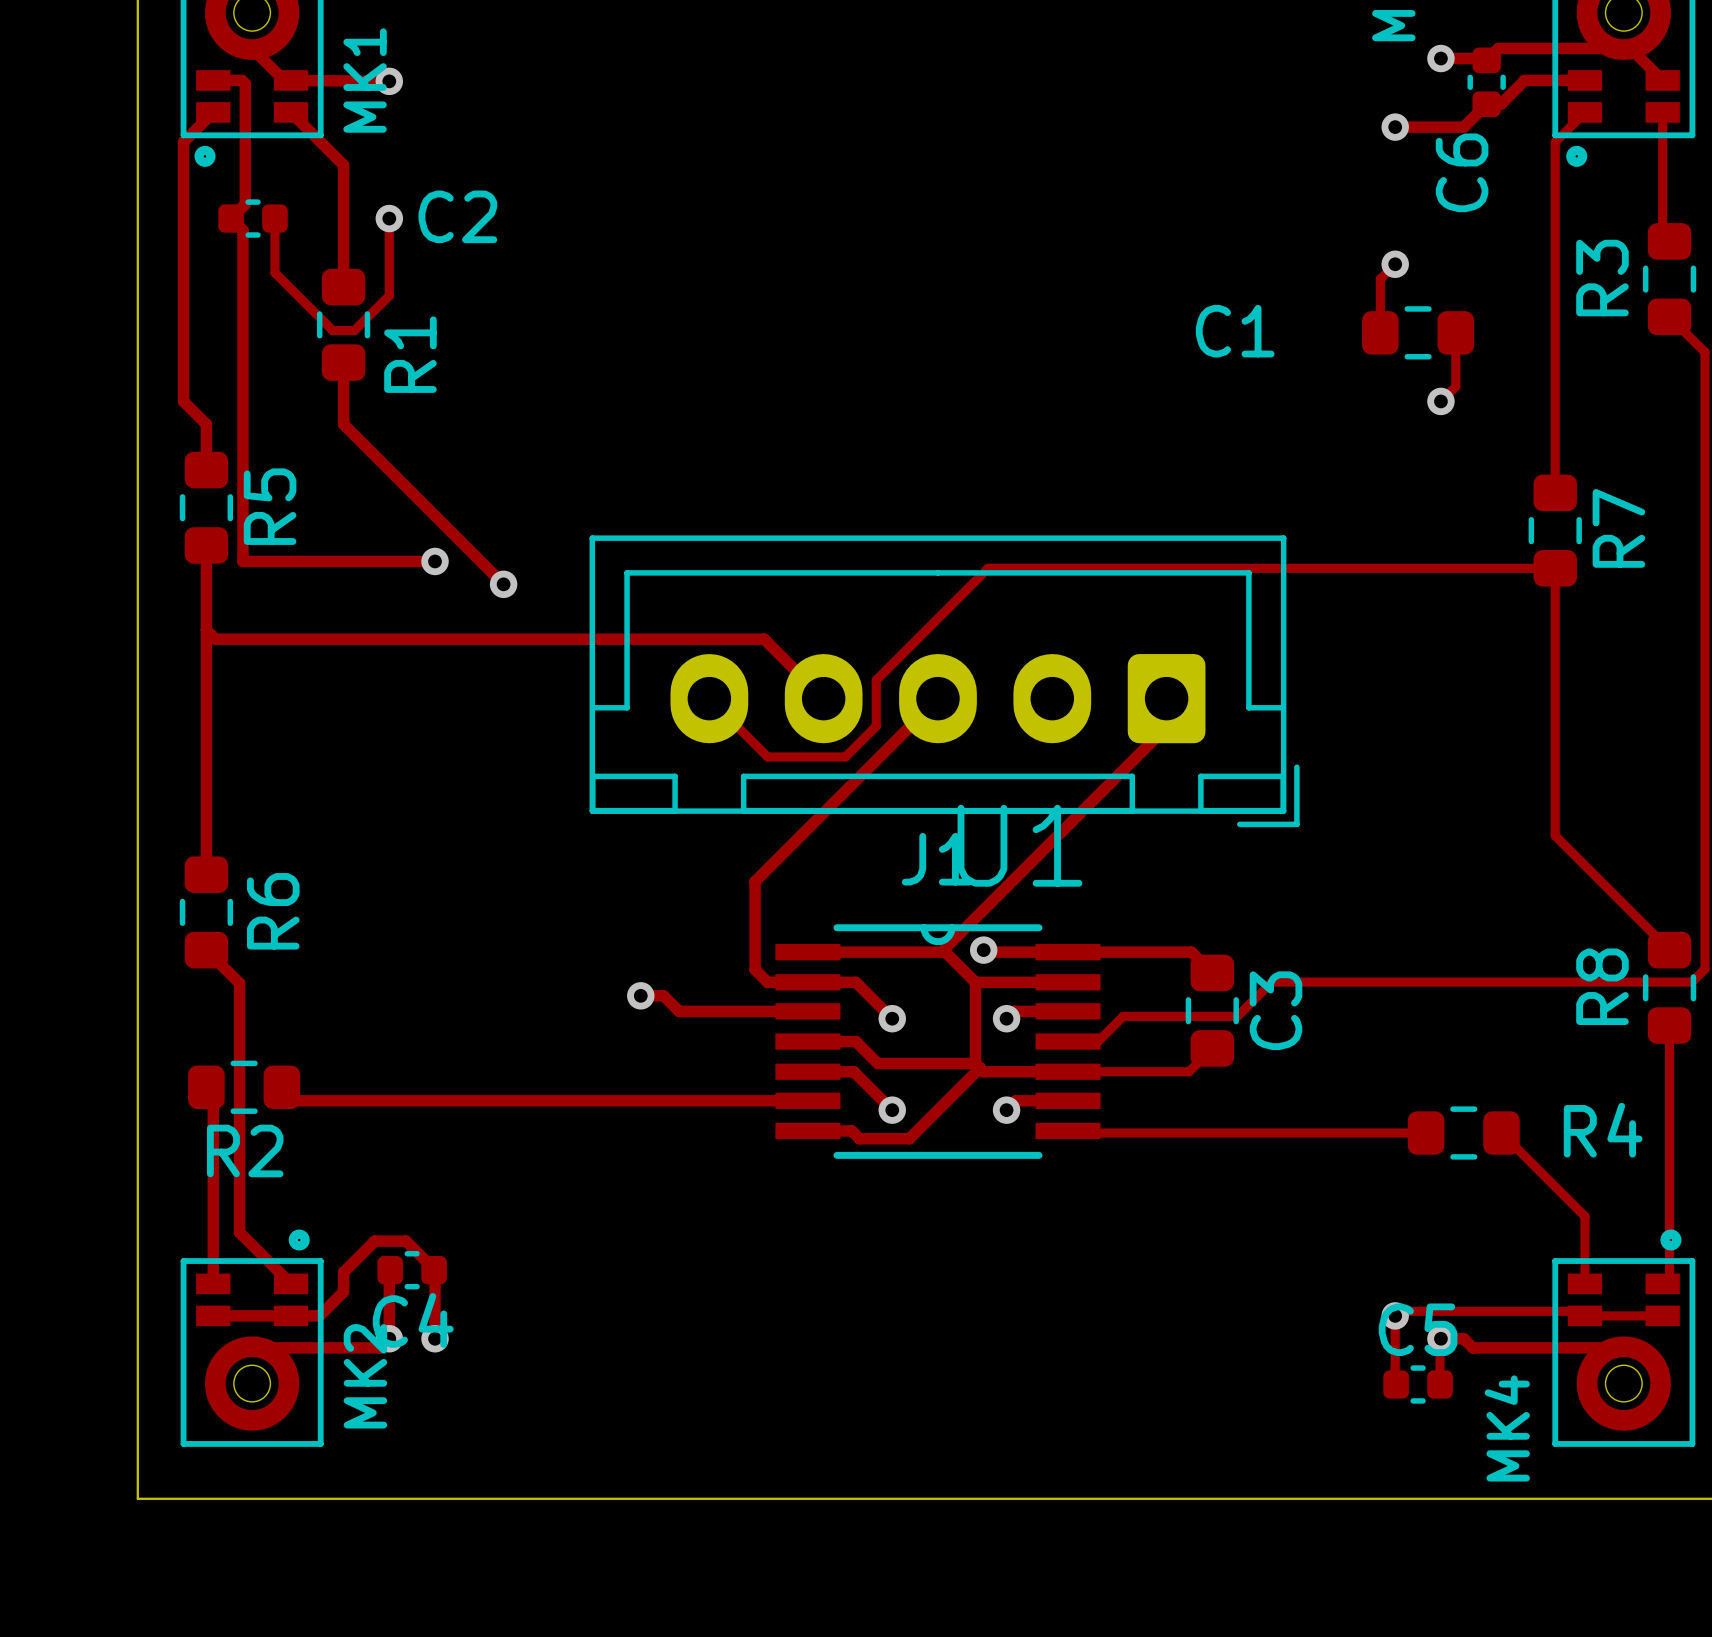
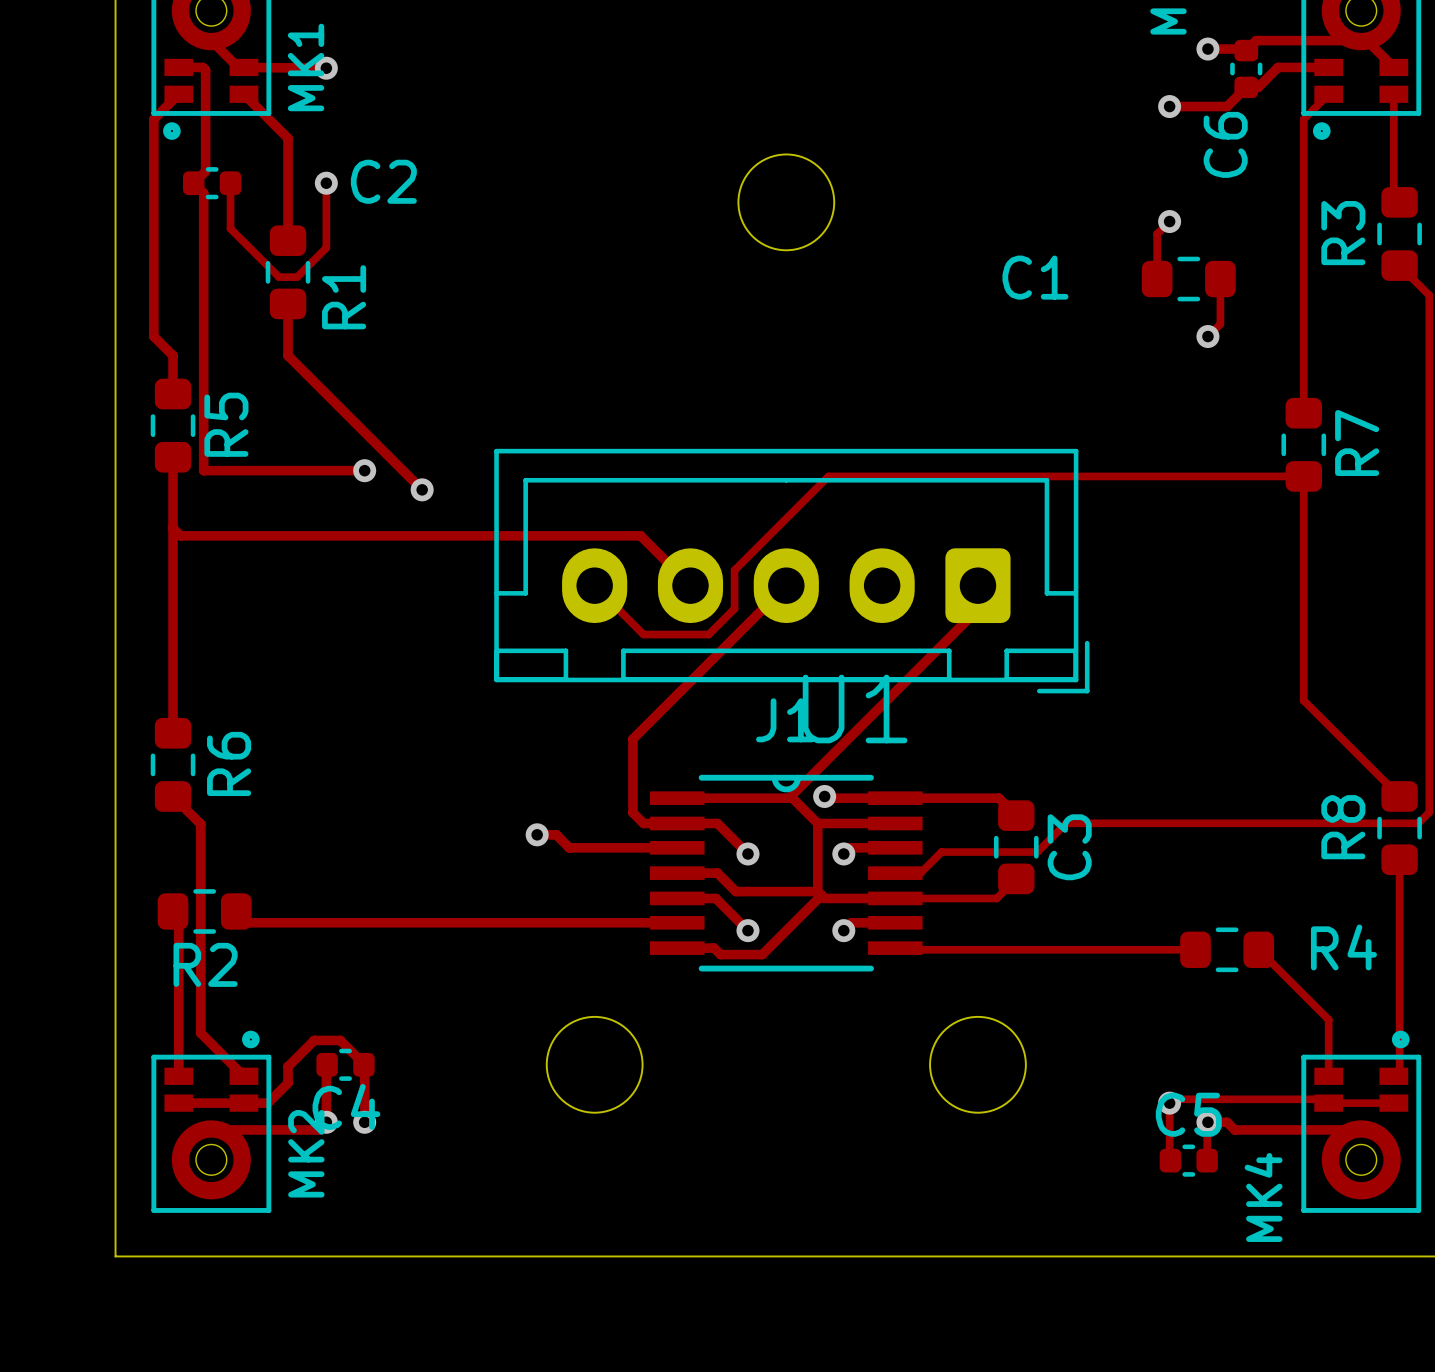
round board edge: none -> [737, 153, 836, 252]
round board edge: none -> [545, 1015, 644, 1114]
round board edge: none -> [929, 1015, 1027, 1114]

